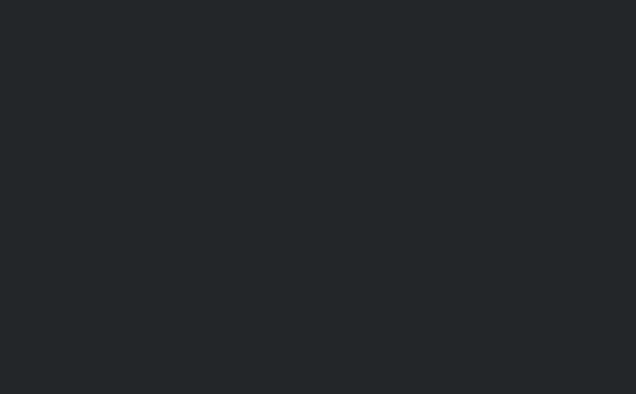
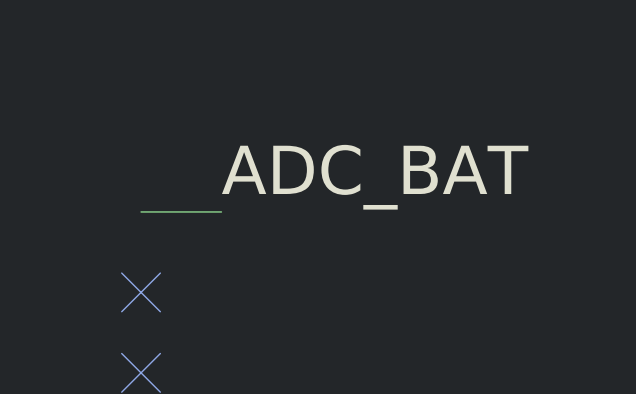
label: none -> ADC_BAT (375, 177)
wire: none -> (141, 211) (221, 211)
no-connect mark: none -> (141, 292)
no-connect mark: none -> (141, 372)

